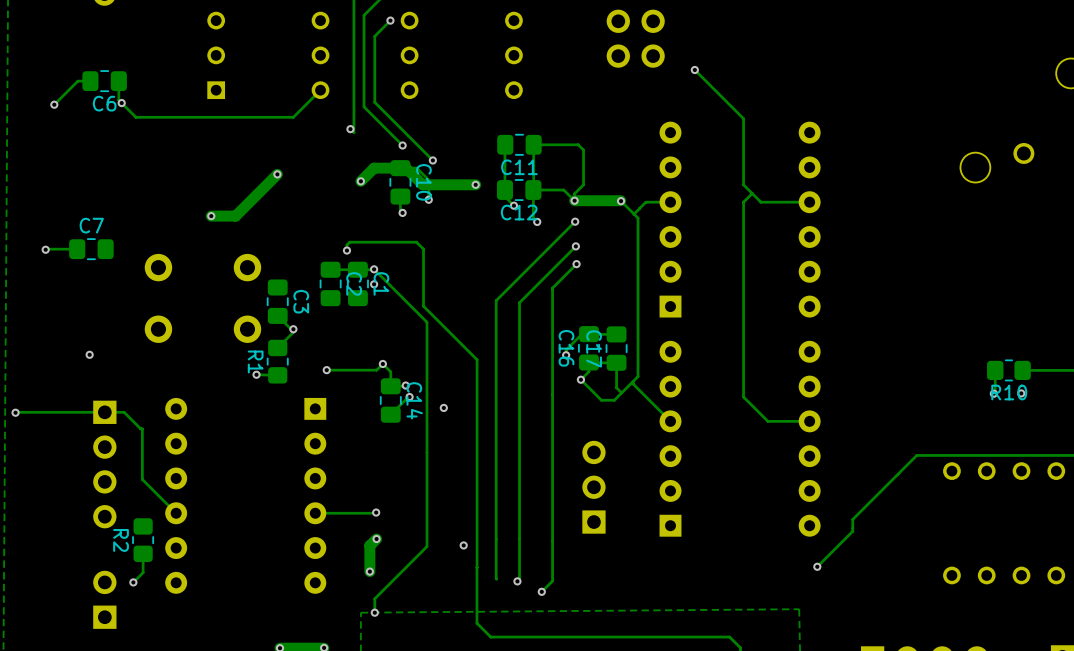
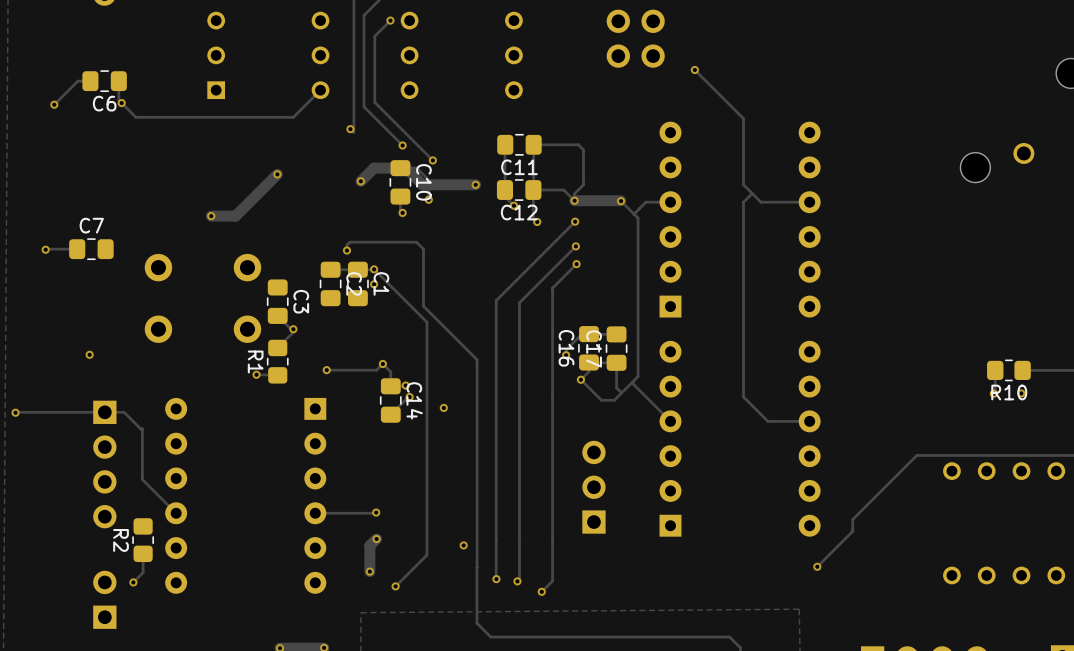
track: (426, 546) (374, 598) (374, 612) -> (426, 546) (426, 555) (395, 586)
via: none -> (496, 579)
via position: (374, 612) -> (395, 586)

